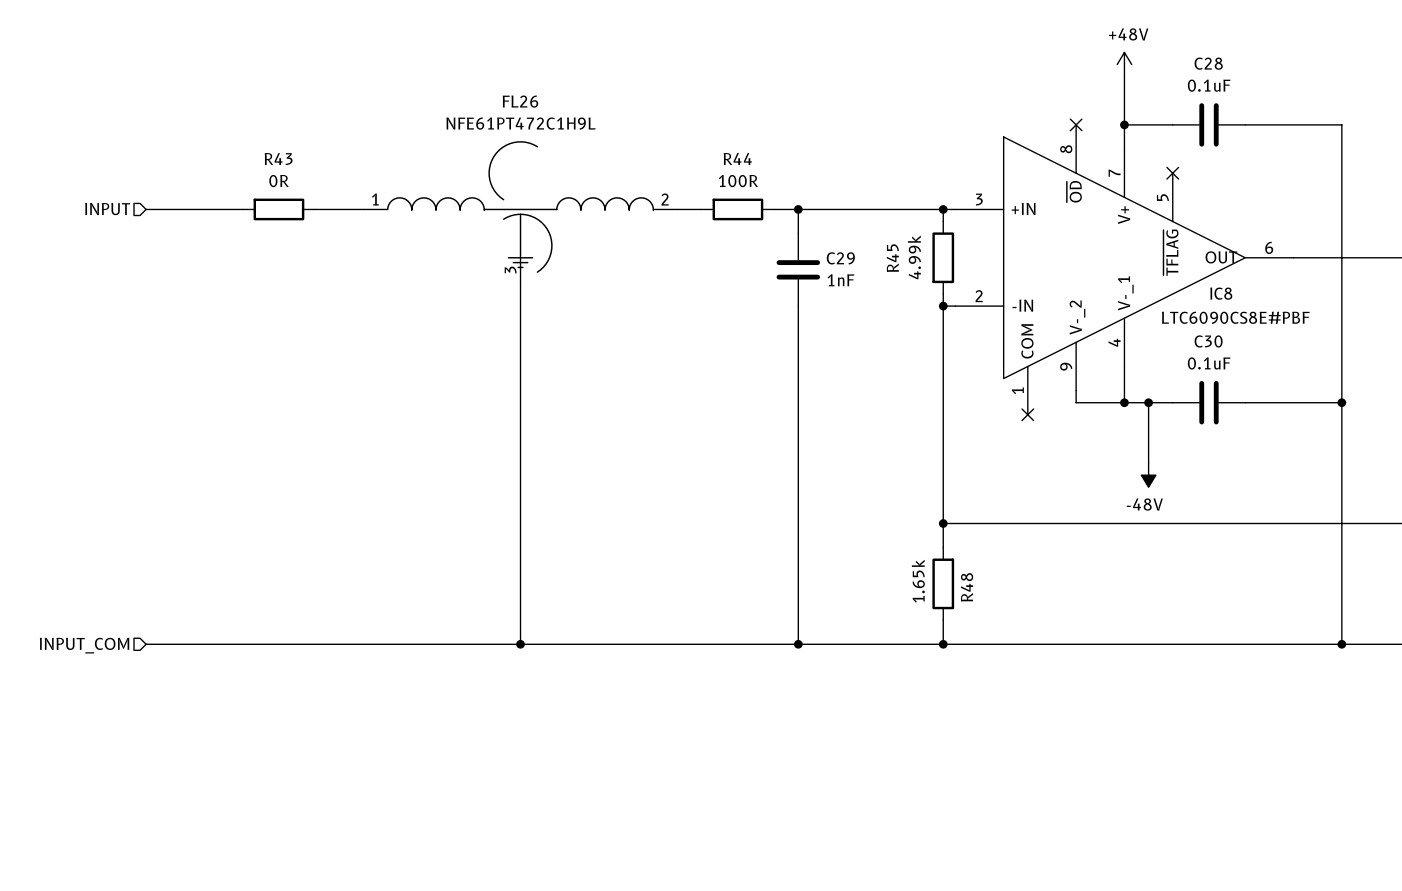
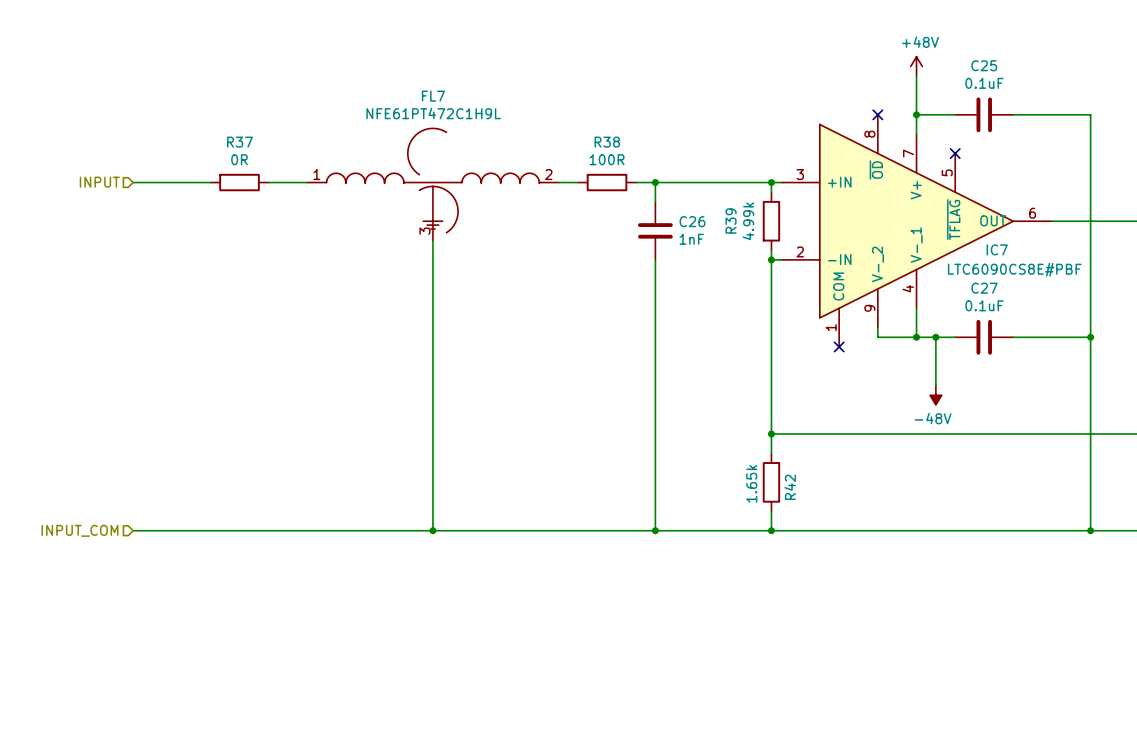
C28 name: C28 (1208, 63) -> C25 (984, 65)
FL26 name: FL26 (520, 101) -> FL7 (433, 96)
R43 name: R43 (278, 159) -> R37 (239, 142)
R44 name: R44 (737, 159) -> R38 (607, 142)
C29 name: C29 (840, 258) -> C26 (692, 221)
R45 name: R45 (892, 258) -> R39 (731, 221)
IC8 name: IC8 (1221, 293) -> IC7 (997, 249)
C30 name: C30 (1208, 341) -> C27 (984, 288)
R48 name: R48 (967, 587) -> R42 (790, 487)

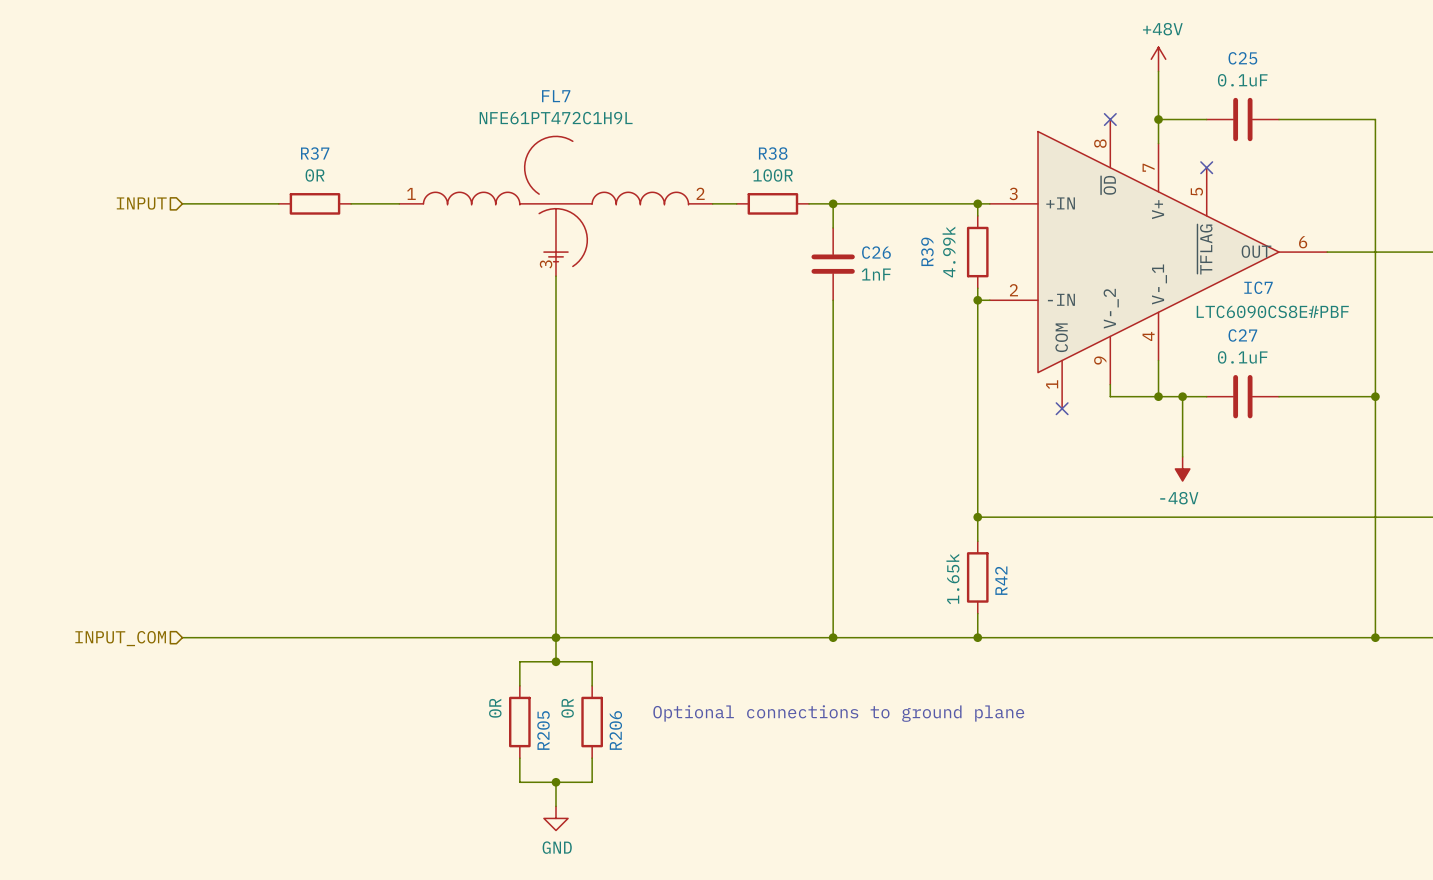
wire: none -> (555, 637) (555, 661)
junction: none -> (555, 661)
wire: none -> (519, 685) (519, 661) (592, 661) (592, 685)
text: none -> Optional connections to ground plane (838, 713)
R205: none -> 0R (519, 722)
R206: none -> 0R (592, 722)
wire: none -> (519, 758) (519, 782) (592, 782) (592, 758)
wire: none -> (555, 782) (555, 806)
junction: none -> (555, 782)
power symbol: none -> GND (555, 818)

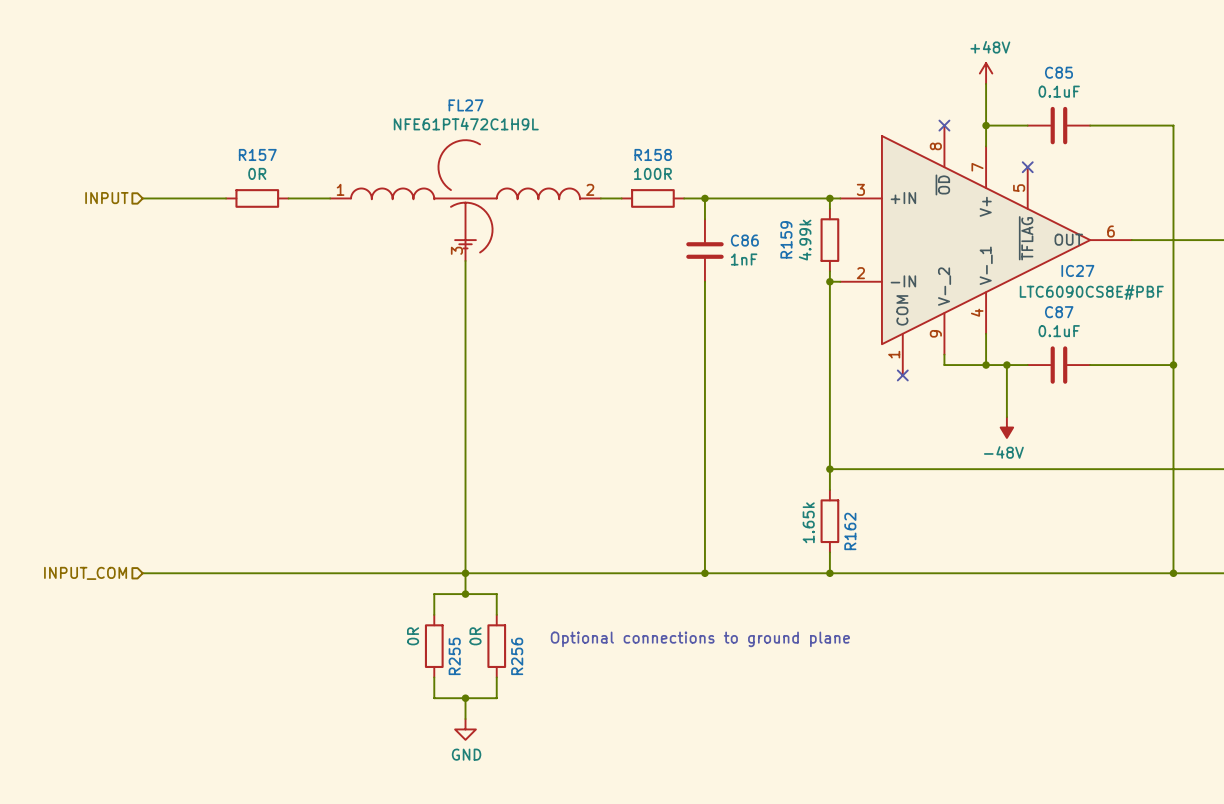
C25 name: C25 (1242, 58) -> C85 (1058, 72)
FL7 name: FL7 (556, 96) -> FL27 (466, 105)
R37 name: R37 (315, 153) -> R157 (257, 154)
R38 name: R38 (773, 153) -> R158 (653, 154)
R39 name: R39 (927, 251) -> R159 (786, 239)
C26 name: C26 (876, 252) -> C86 (744, 240)
IC7 name: IC7 (1258, 287) -> IC27 (1077, 270)
C27 name: C27 (1242, 335) -> C87 (1059, 312)
R42 name: R42 (1001, 580) -> R162 (850, 531)
R205 name: R205 (543, 730) -> R255 (454, 656)
R206 name: R206 (615, 730) -> R256 (517, 656)

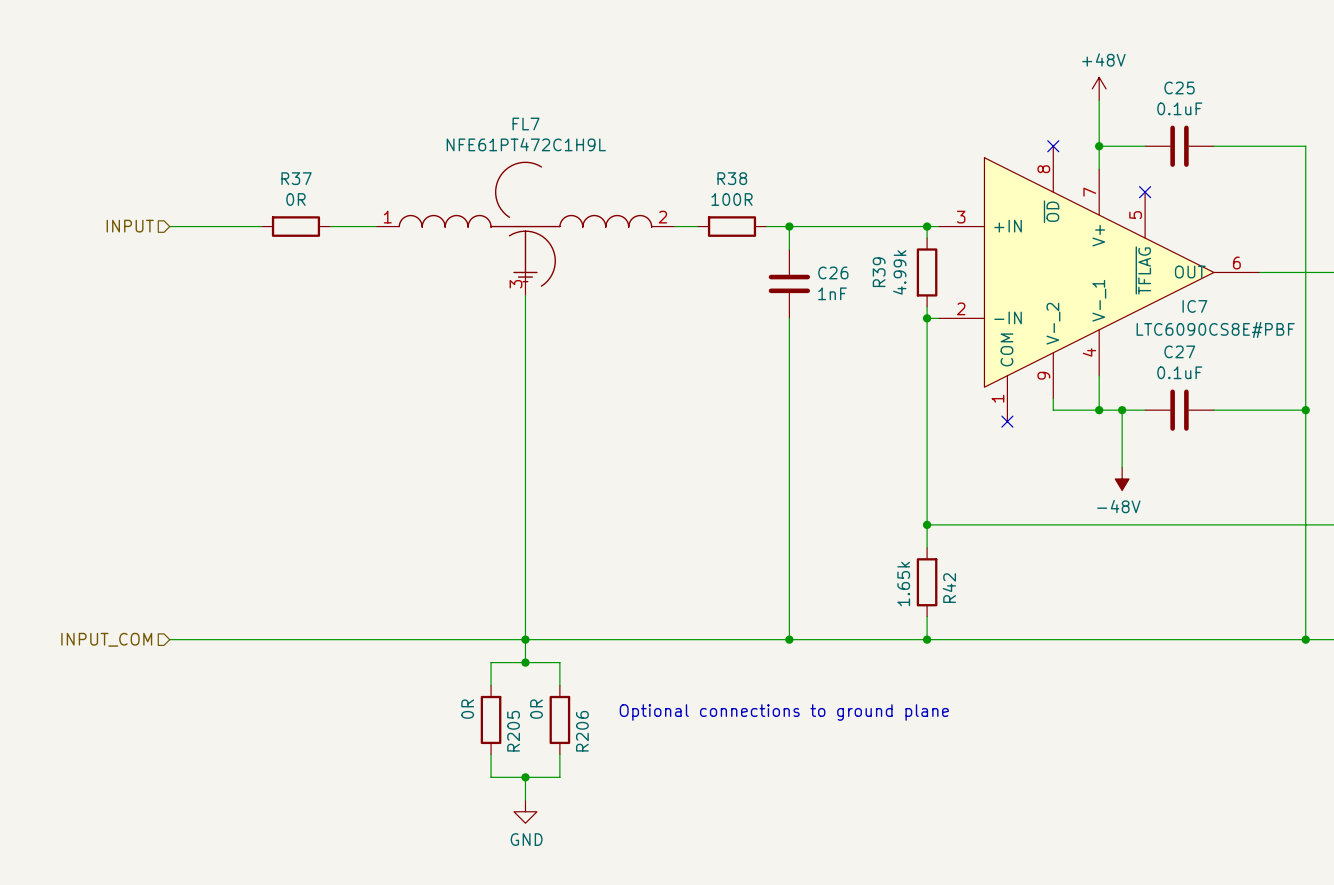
C85 name: C85 (1058, 72) -> C25 (1179, 87)
FL27 name: FL27 (466, 105) -> FL7 (526, 124)
R157 name: R157 (257, 154) -> R37 (296, 178)
R158 name: R158 (653, 154) -> R38 (732, 178)
R159 name: R159 (786, 239) -> R39 (879, 272)
C86 name: C86 (744, 240) -> C26 (833, 272)
IC27 name: IC27 (1077, 270) -> IC7 (1194, 306)
C87 name: C87 (1059, 312) -> C27 (1179, 351)
R162 name: R162 (850, 531) -> R42 (949, 588)
R255 name: R255 (454, 656) -> R205 (513, 731)
R256 name: R256 (517, 656) -> R206 (582, 731)

